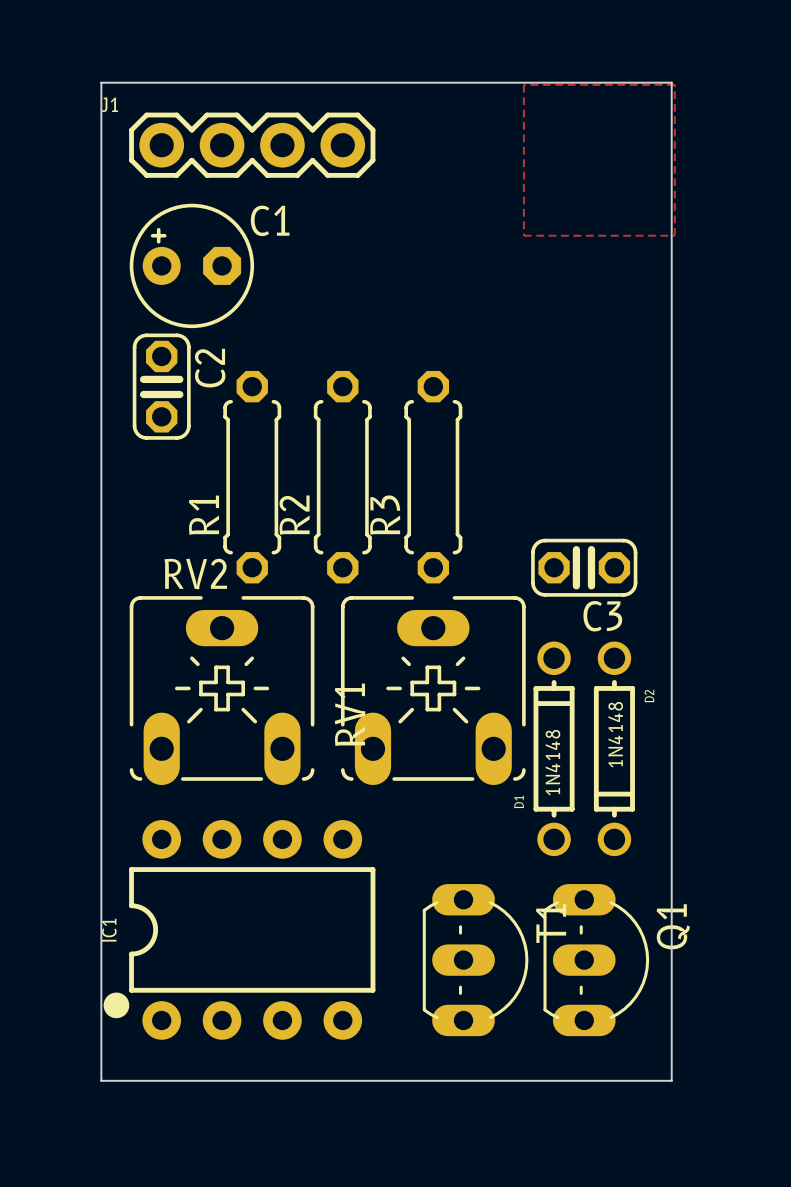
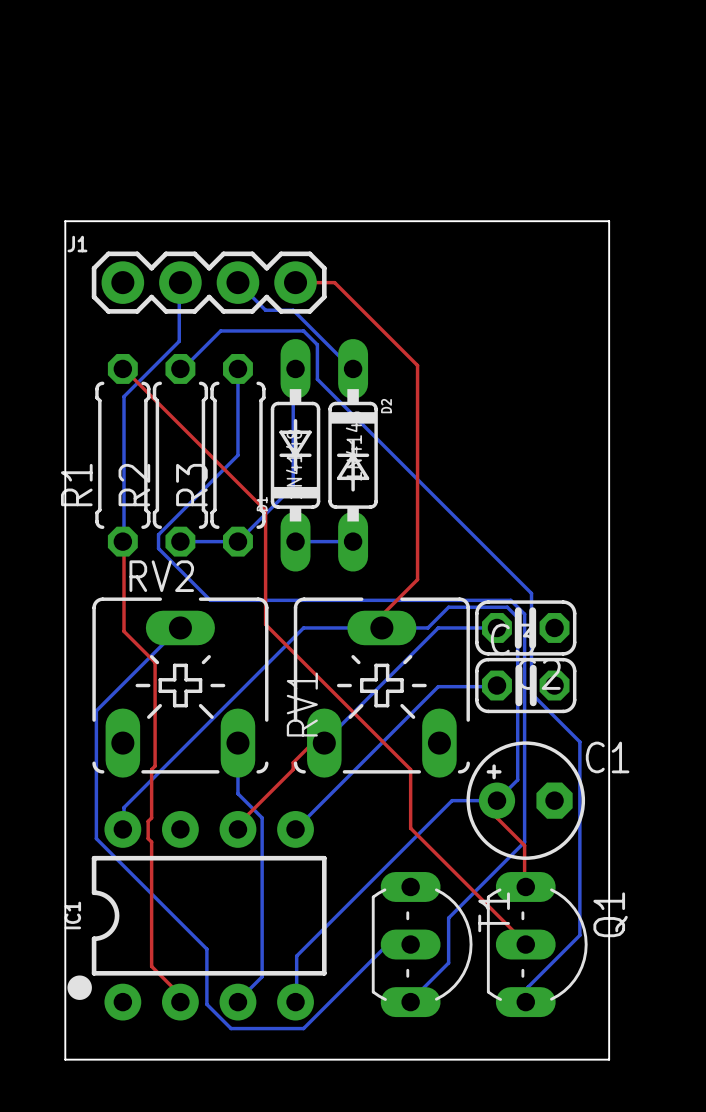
top zone outline: (523, 84) (674, 84) (674, 235) (523, 235) (523, 84) -> none
J1 position: (252, 145) -> (209, 282)
board edge: (101, 201) (101, 82) (671, 82) (671, 201) -> (65, 221) (609, 221)
C1 position: (191, 265) -> (525, 800)
bottom track: none -> (180, 282) (179, 341) (124, 396) (122, 541)
bottom track: none -> (237, 282) (265, 310) (293, 310) (353, 368)
top track: none -> (295, 282) (334, 282) (417, 365) (417, 579) (383, 614) (381, 627)
top track: none -> (122, 368) (265, 510) (265, 624) (410, 769) (410, 828) (525, 944)
bottom track: none -> (180, 368) (182, 368) (220, 330) (303, 330) (317, 344) (317, 379) (531, 593) (531, 693) (579, 741) (579, 935) (528, 987) (528, 1000) (525, 1002)
bottom track: none -> (237, 368) (237, 455) (158, 534) (158, 548) (210, 600) (510, 600) (524, 614) (524, 842) (448, 918) (448, 962) (410, 1002)
bottom track: none -> (295, 368) (293, 368) (293, 486) (237, 541) (180, 541)
C2 rotation: 0° (161, 386) -> 90° clockwise (525, 627)
C2 position: (161, 386) -> (525, 627)
R1 position: (252, 477) -> (122, 455)
R2 position: (342, 477) -> (180, 455)
R3 position: (433, 477) -> (237, 455)
top track: none -> (122, 541) (124, 631) (155, 662) (155, 766) (151, 769) (151, 817) (148, 821) (148, 838) (151, 842) (151, 966) (179, 994) (180, 1002)
bottom track: none -> (295, 541) (353, 541)
C3 rotation: 0° (584, 567) -> 180° (525, 685)
C3 position: (584, 567) -> (525, 685)
bottom track: none -> (180, 627) (96, 710) (96, 838) (206, 949) (206, 1004) (231, 1028) (303, 1028) (386, 945) (410, 944)
bottom track: none -> (496, 627) (438, 627) (324, 743)
D1 footprint: [533, 641, 575, 857] -> [270, 339, 321, 572]
D2 footprint: [593, 641, 635, 857] -> [328, 339, 378, 572]
bottom track: none -> (496, 685) (438, 686) (295, 829)
bottom track: none -> (237, 743) (237, 793) (262, 817) (262, 976) (237, 1002)
top track: none -> (324, 743) (324, 745) (310, 745) (293, 762) (293, 769) (248, 814) (248, 817) (237, 829)
top track: none -> (496, 800) (496, 817) (524, 845) (525, 886)
bottom track: none -> (122, 829) (124, 807) (303, 627) (427, 627) (448, 607) (507, 607) (517, 617) (517, 779) (496, 800) (452, 800) (296, 956) (295, 1002)

